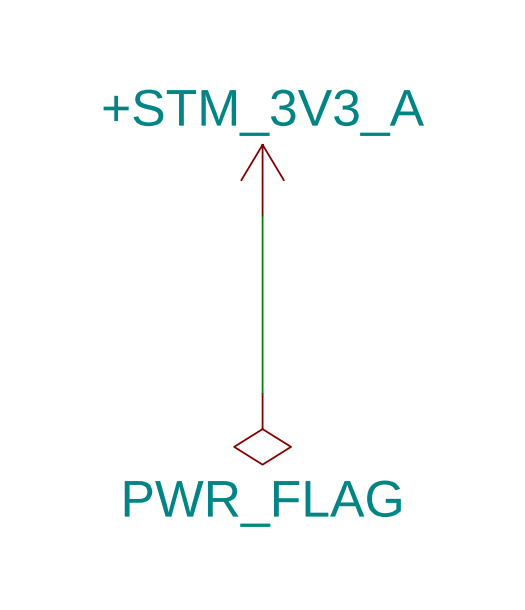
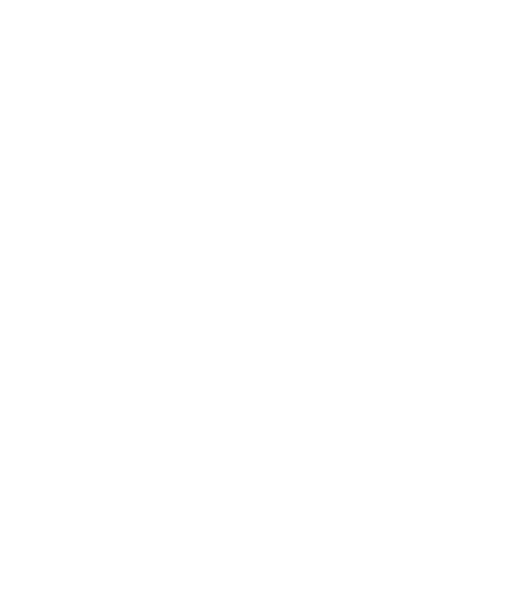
power symbol: +STM_3V3_A (262, 180) -> none
wire: (262, 215) (262, 393) -> none
power symbol: PWR_FLAG (262, 429) -> none

